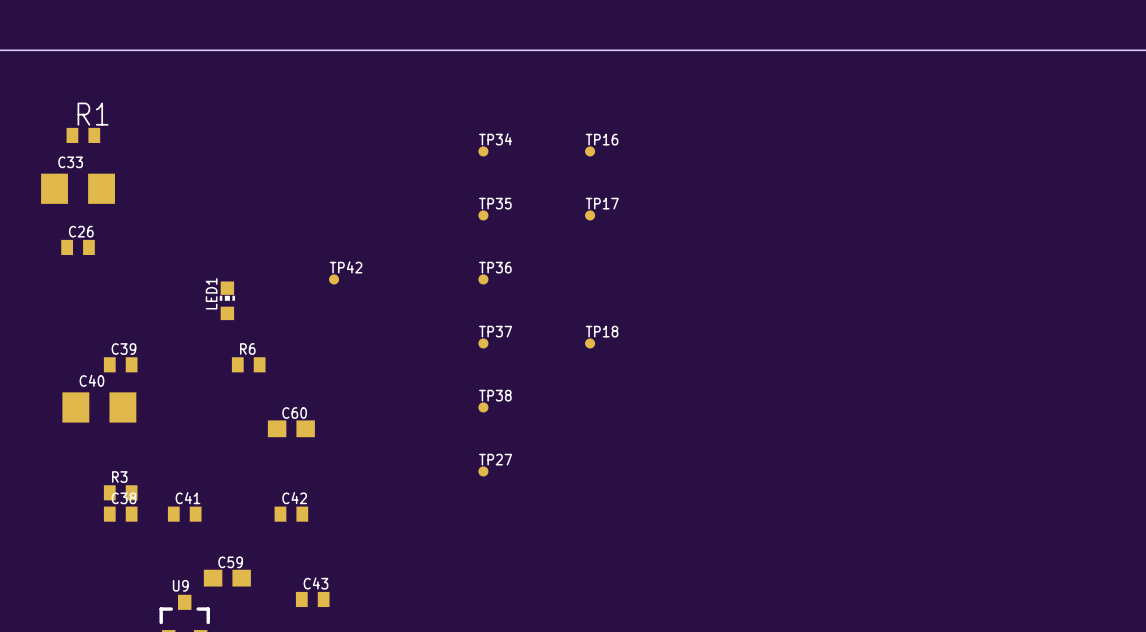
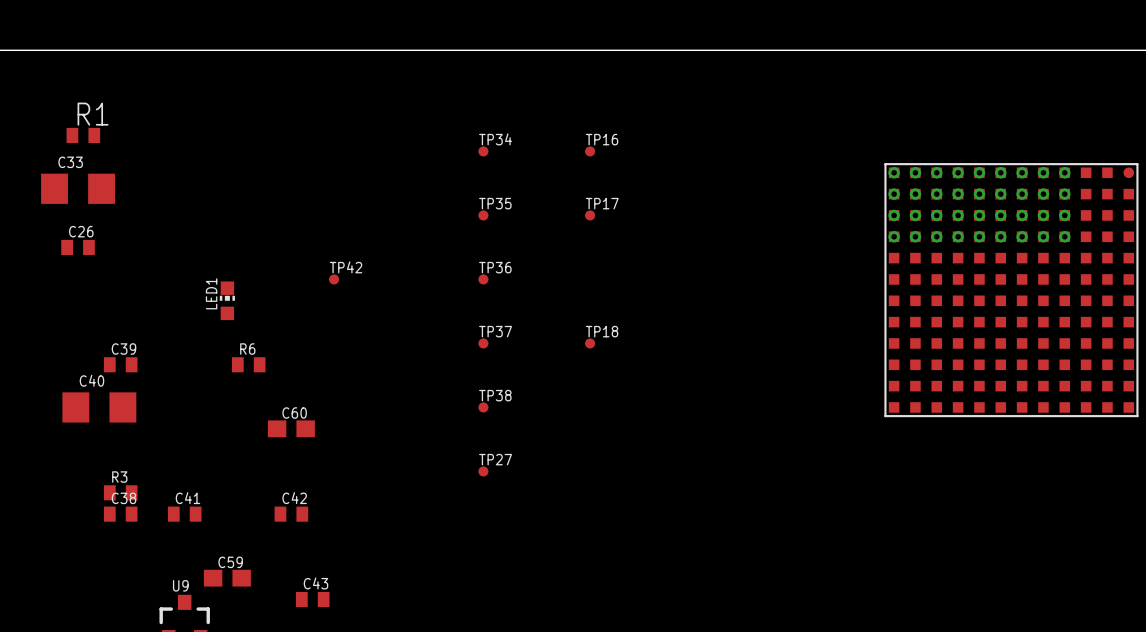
via: none -> (894, 172)
via: none -> (915, 172)
via: none -> (936, 172)
via: none -> (958, 172)
via: none -> (979, 172)
via: none -> (1000, 172)
via: none -> (1022, 172)
via: none -> (1043, 172)
via: none -> (1064, 172)
via: none -> (894, 194)
via: none -> (915, 194)
via: none -> (936, 194)
via: none -> (958, 194)
via: none -> (979, 194)
via: none -> (1000, 194)
via: none -> (1022, 194)
via: none -> (1043, 194)
via: none -> (1064, 194)
via: none -> (894, 215)
via: none -> (915, 215)
via: none -> (936, 215)
via: none -> (958, 215)
via: none -> (979, 215)
via: none -> (1000, 215)
via: none -> (1022, 215)
via: none -> (1043, 215)
via: none -> (1064, 215)
via: none -> (894, 236)
via: none -> (915, 236)
via: none -> (936, 236)
via: none -> (958, 236)
via: none -> (979, 236)
via: none -> (1000, 236)
via: none -> (1022, 236)
via: none -> (1043, 236)
via: none -> (1064, 236)
part: none -> (1011, 290)

